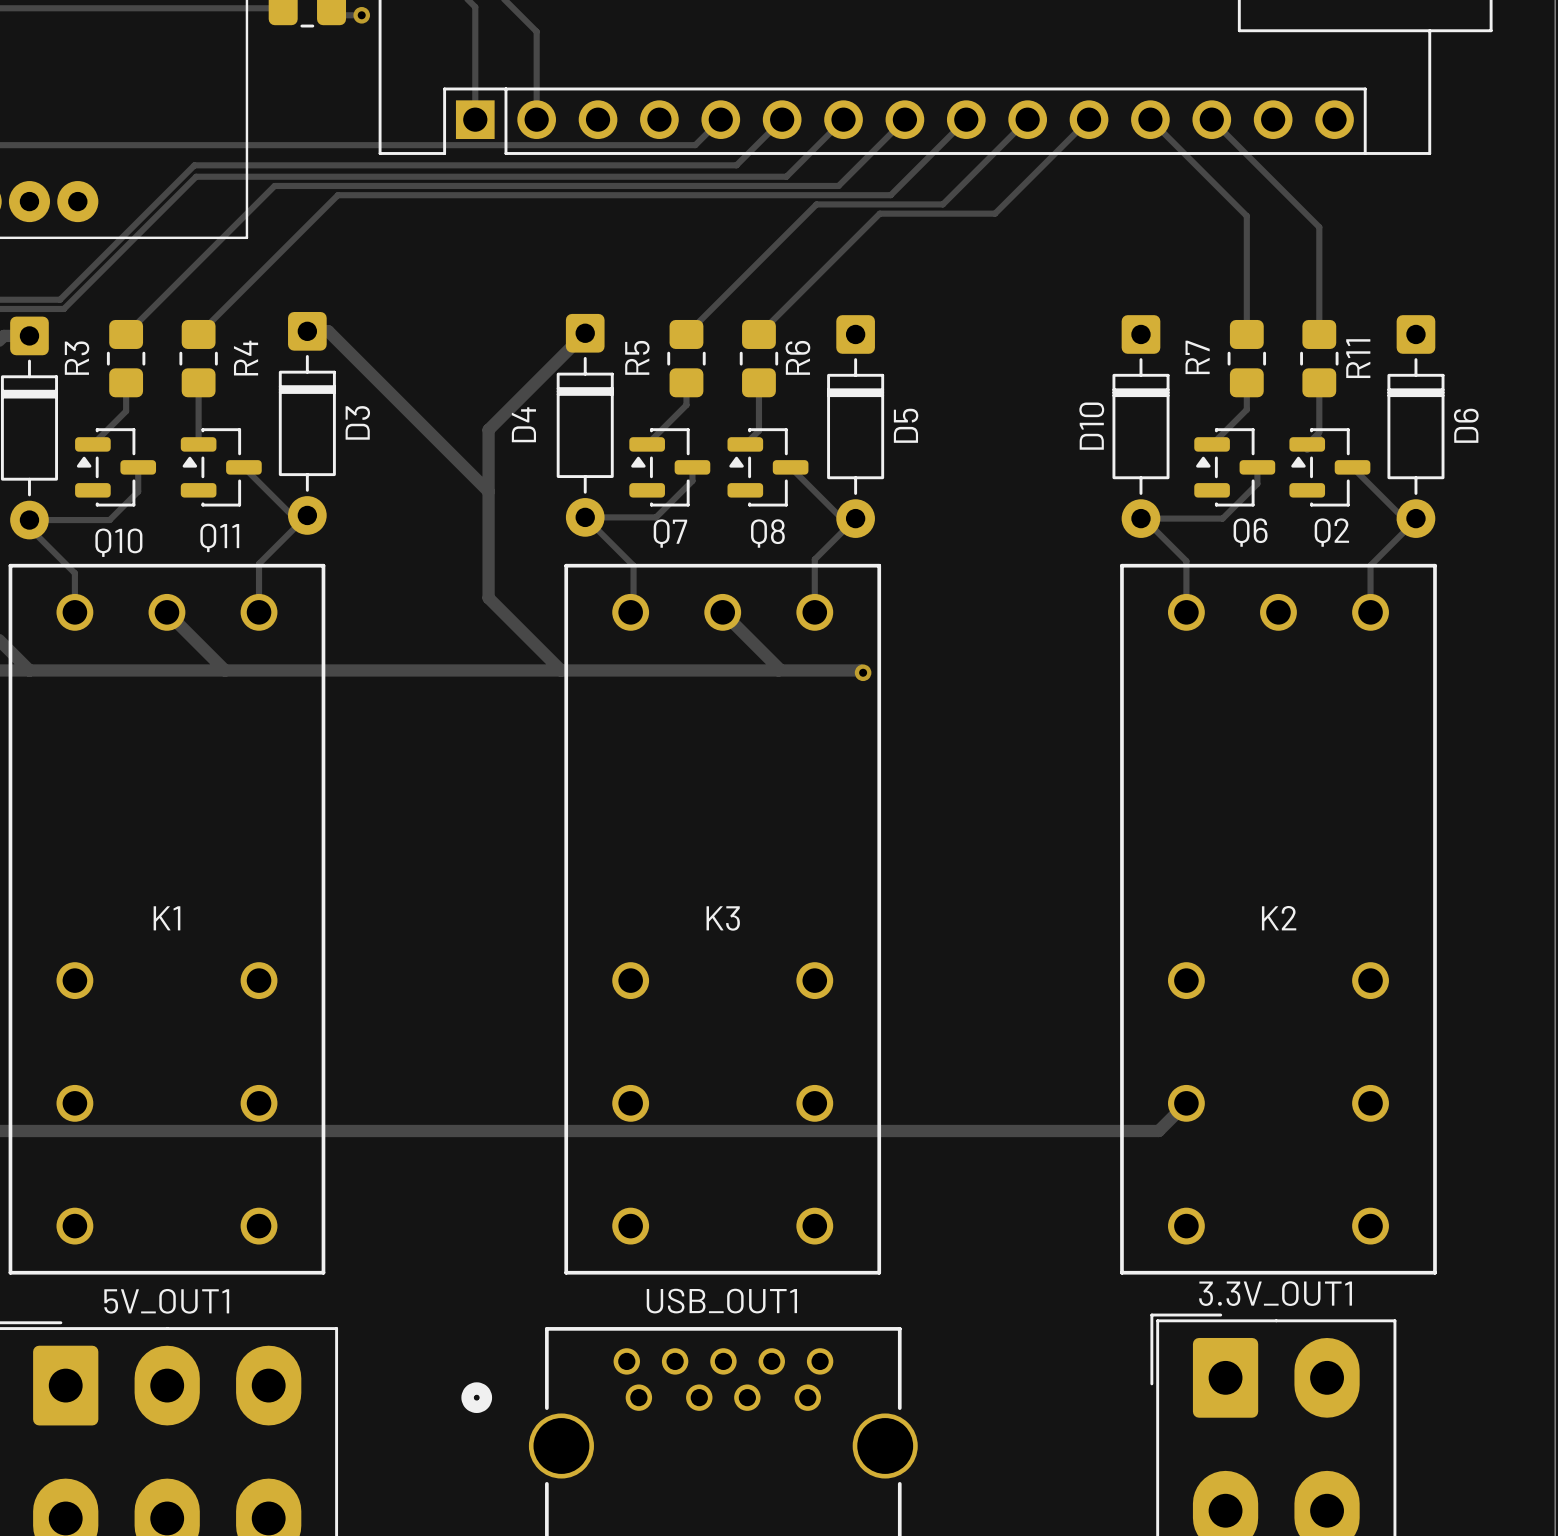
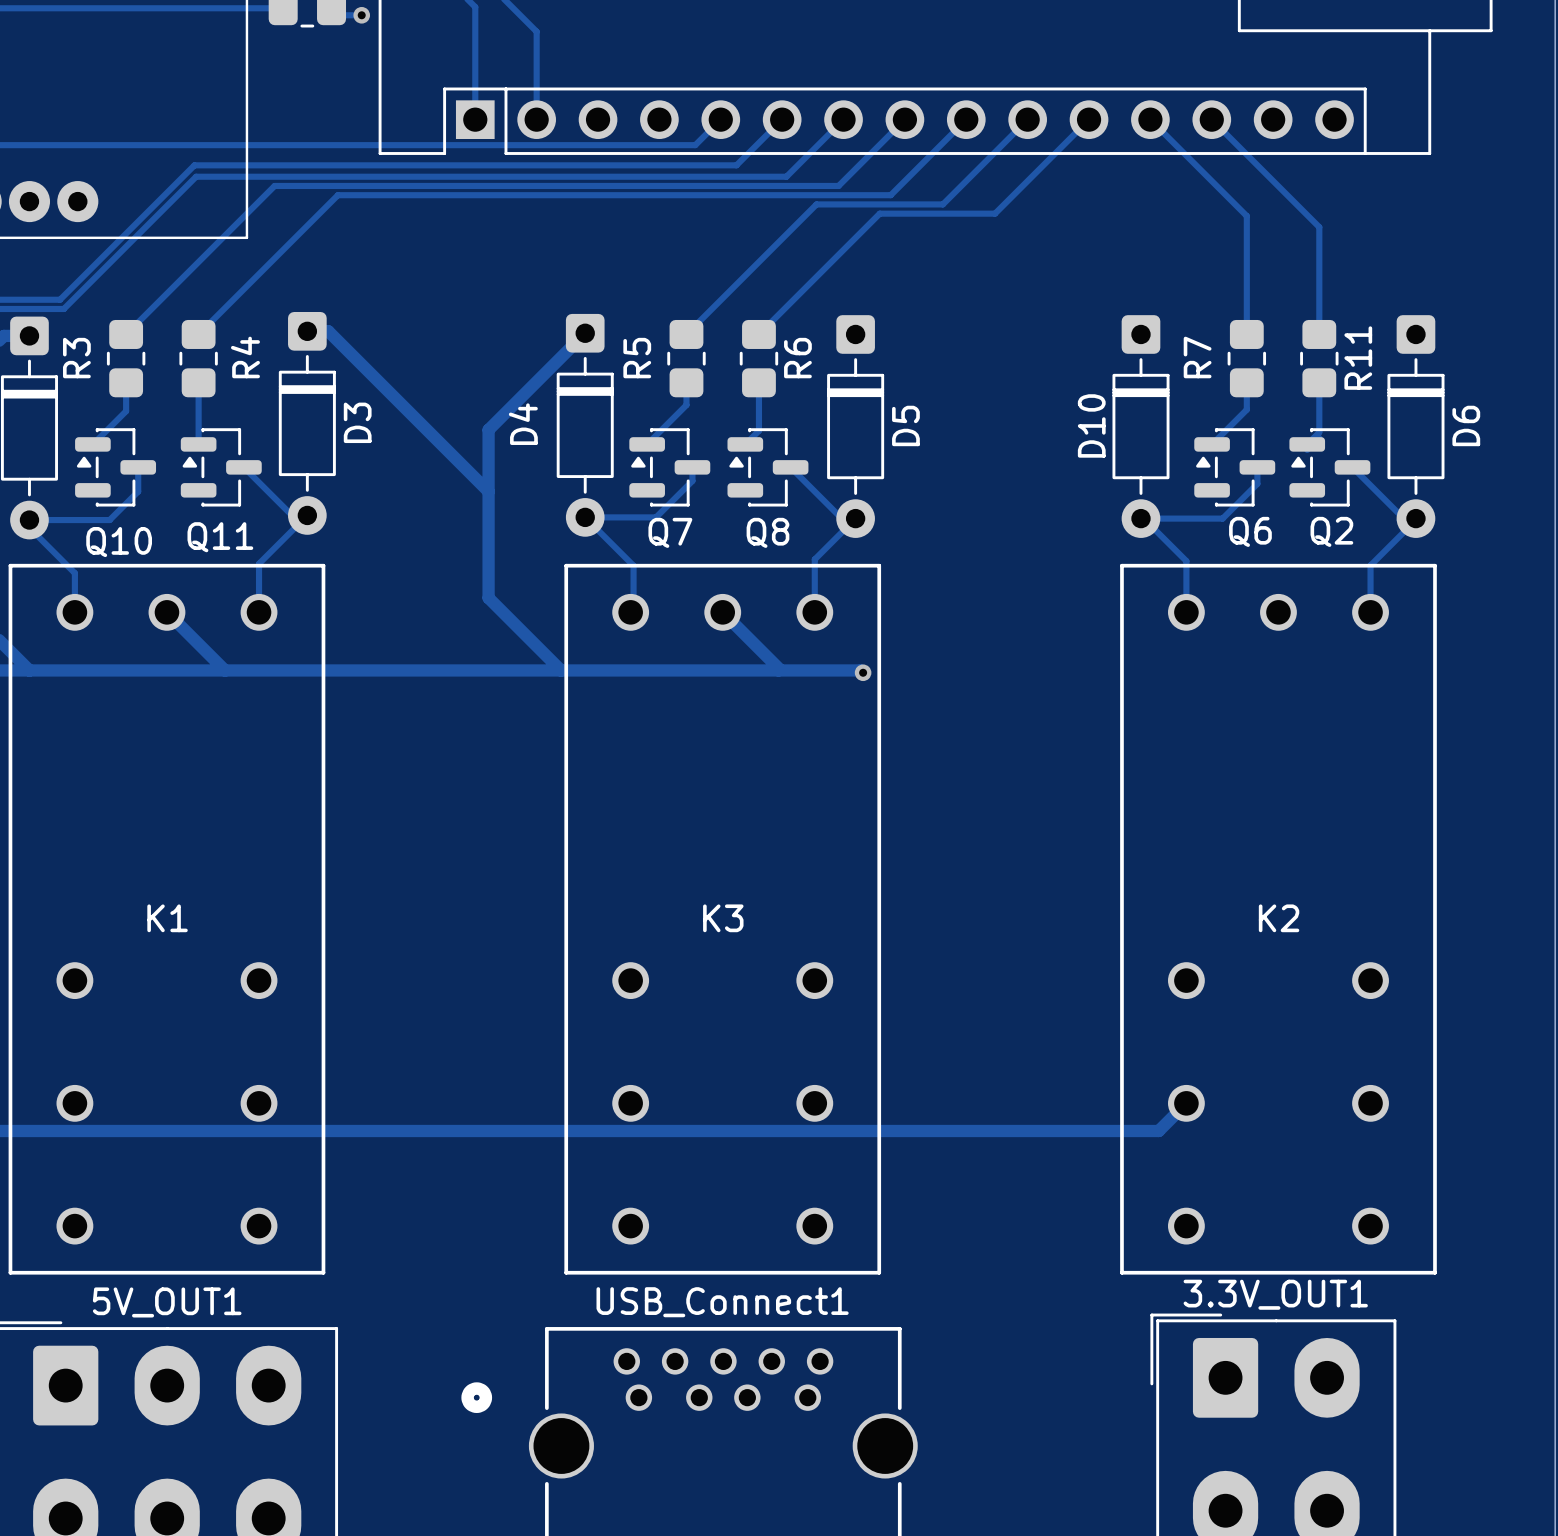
USB_OUT1 name: USB_OUT1 (721, 1301) -> USB_Connect1 (722, 1302)

